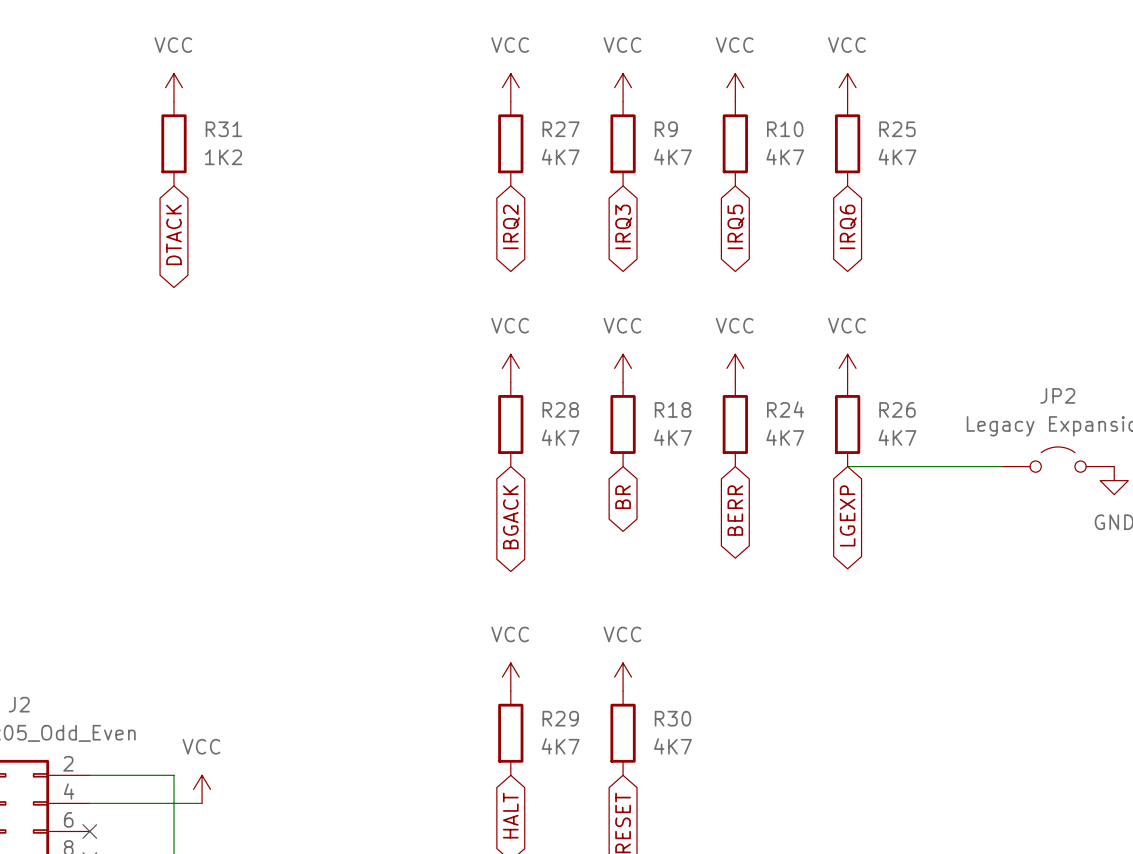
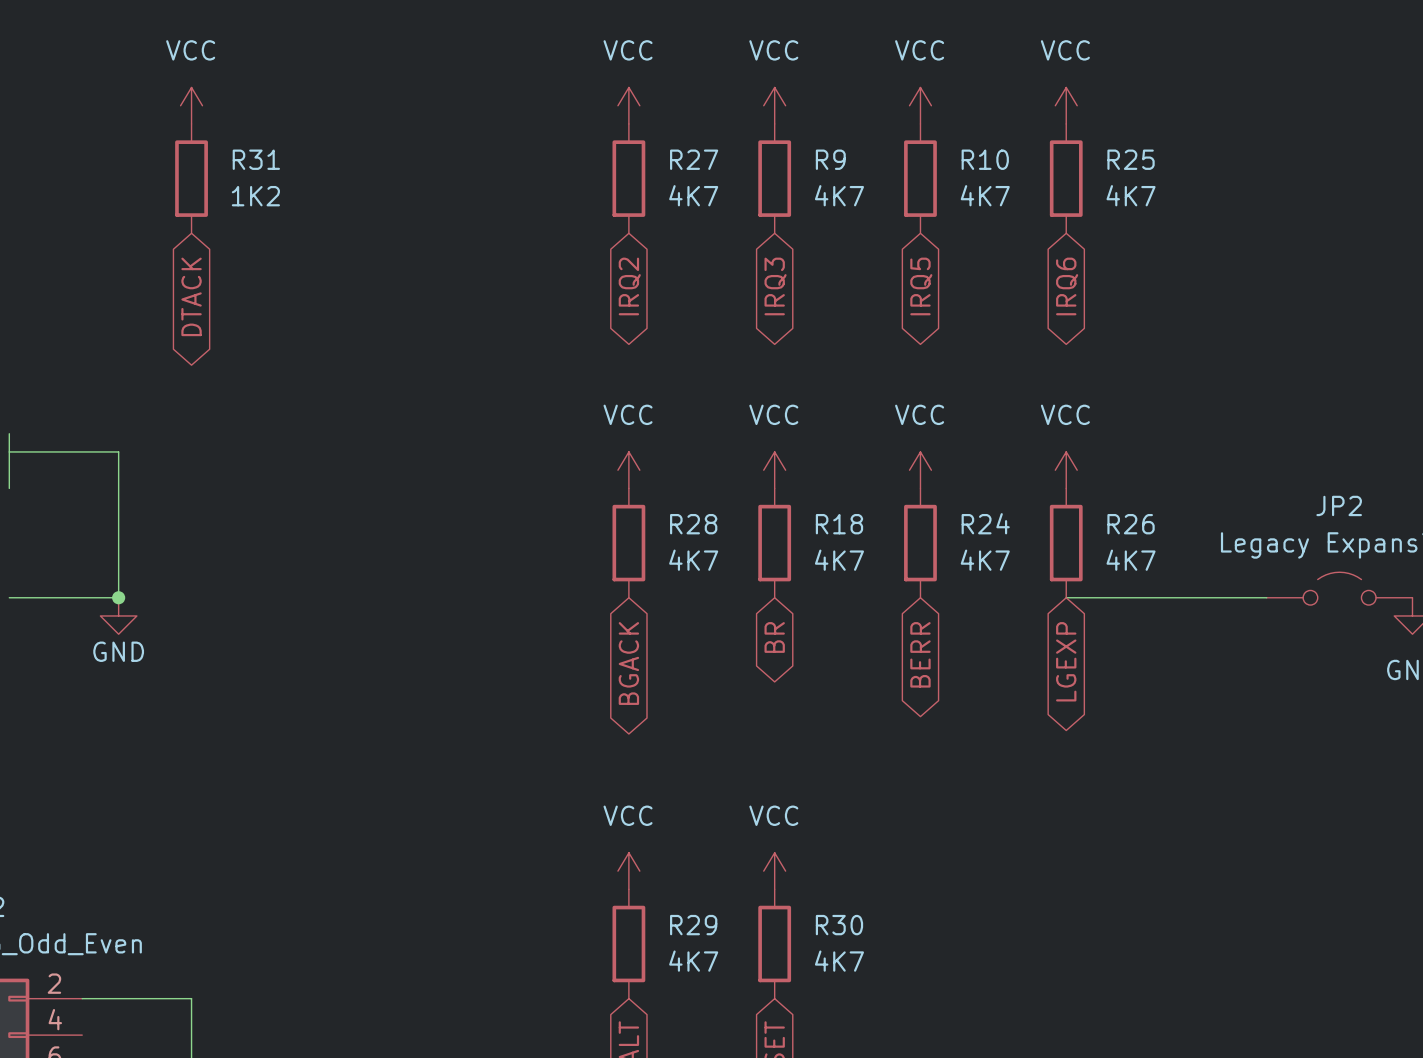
wire: none -> (9, 433) (9, 488)
wire: none -> (9, 451) (118, 451) (118, 597) (9, 597)
junction: none -> (118, 597)
power symbol: none -> GND (118, 615)
power symbol: VCC (202, 789) -> none
wire: (89, 803) (202, 803) -> none

